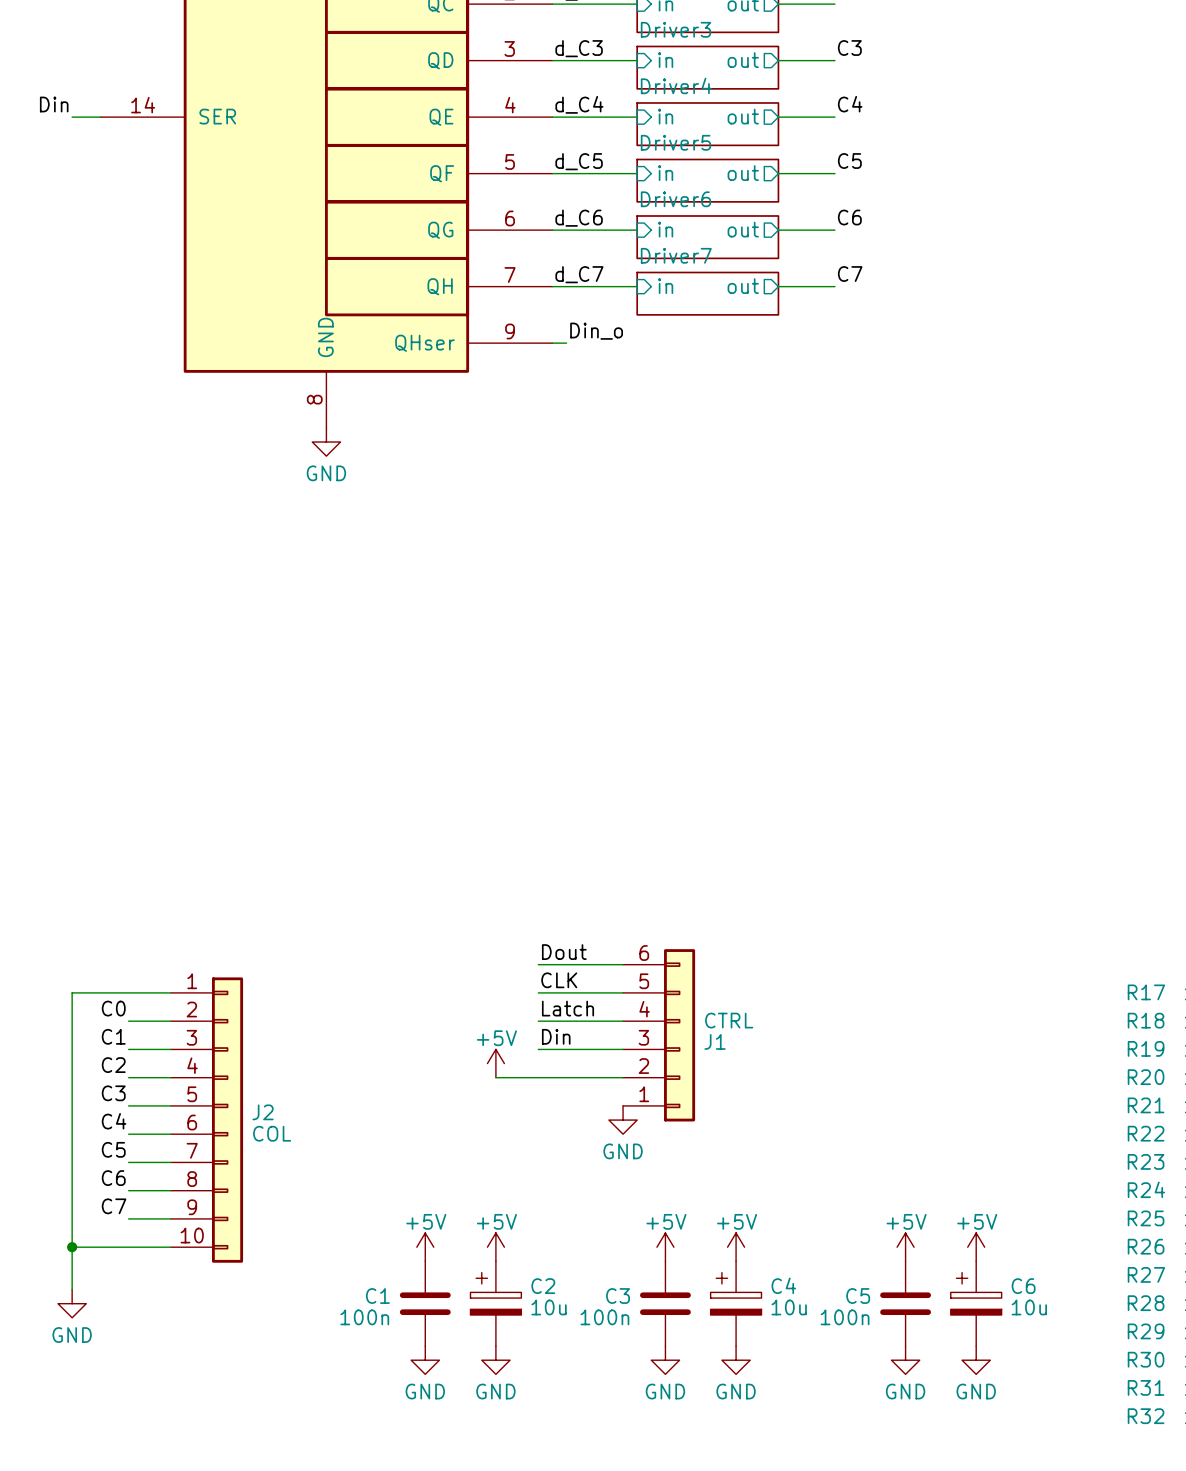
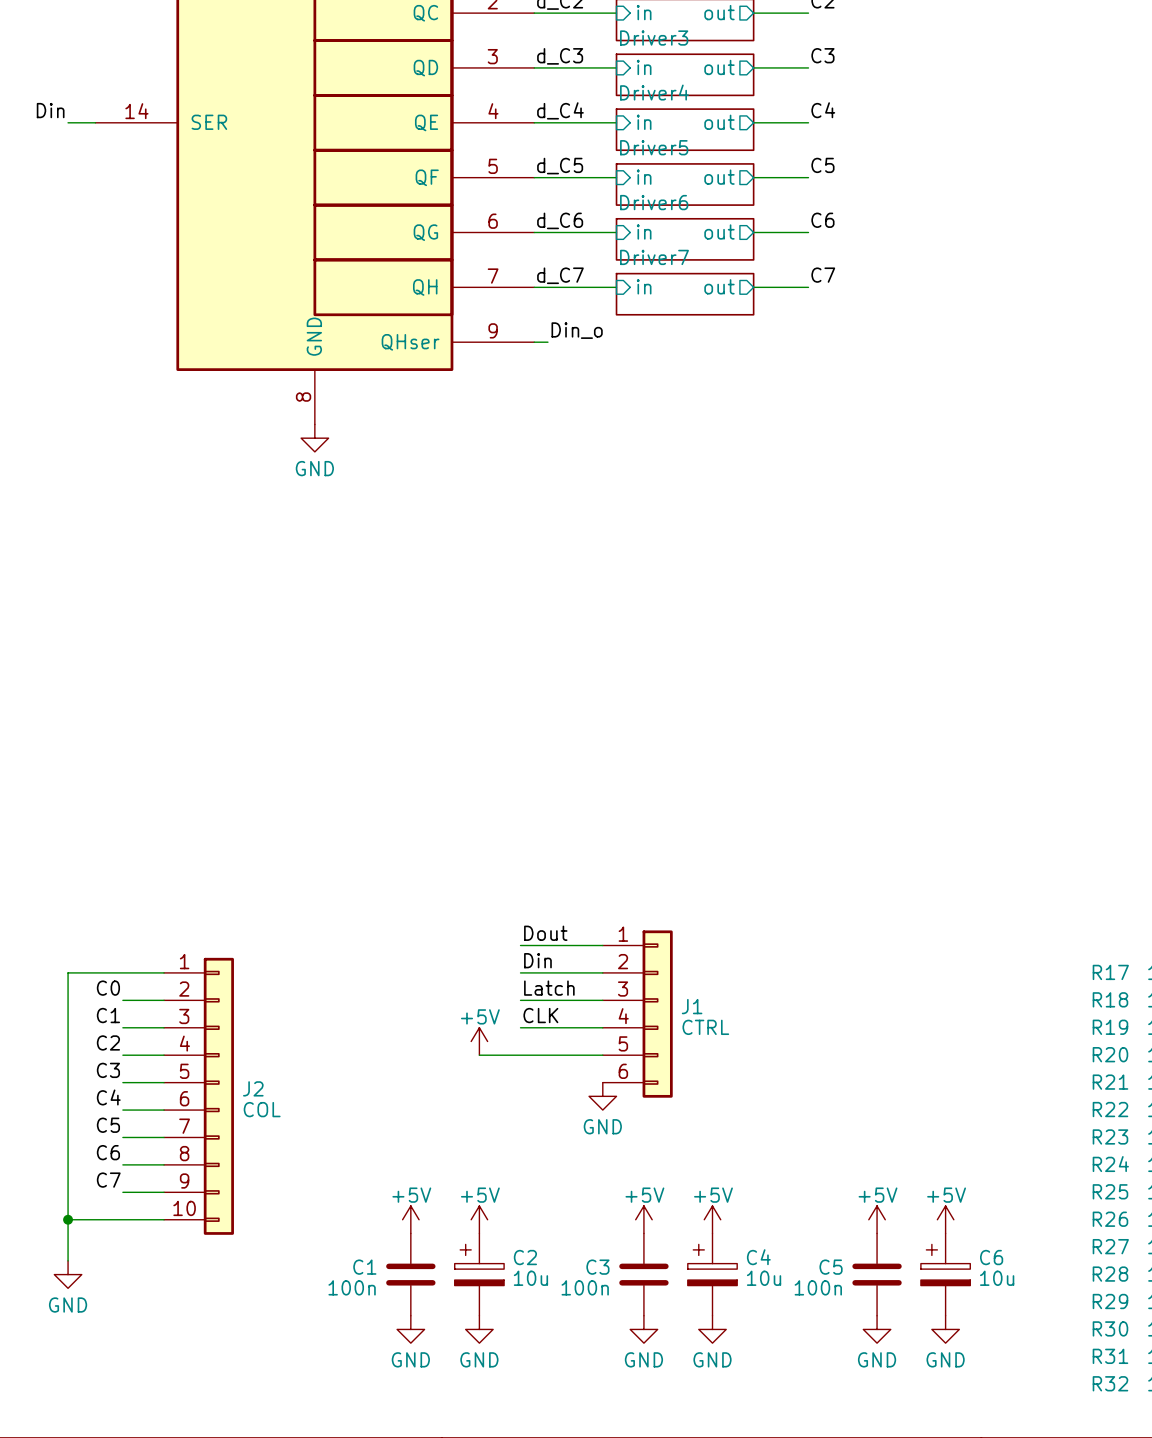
label: CLK (559, 980) -> Din (537, 960)
J1 flip: as is (679, 1035) -> up-down (657, 1014)
label: Din (556, 1036) -> CLK (540, 1015)

